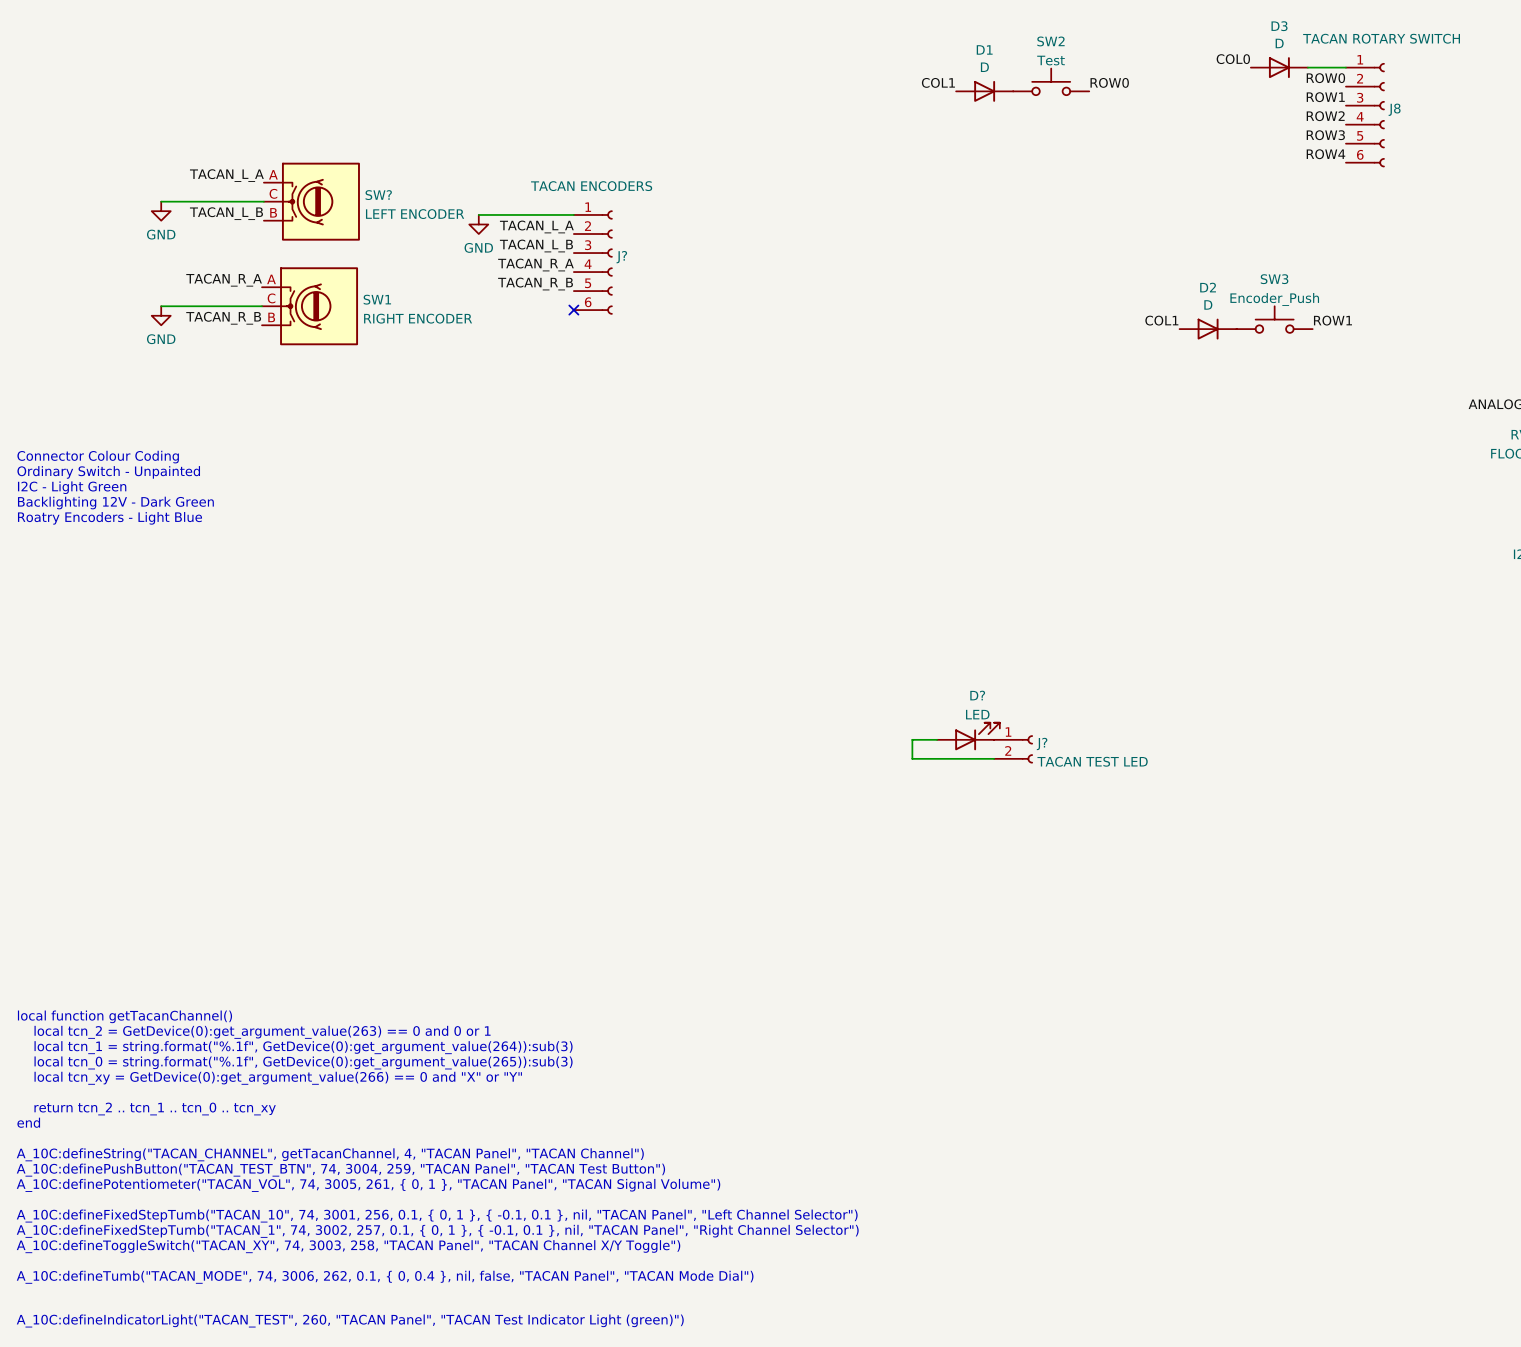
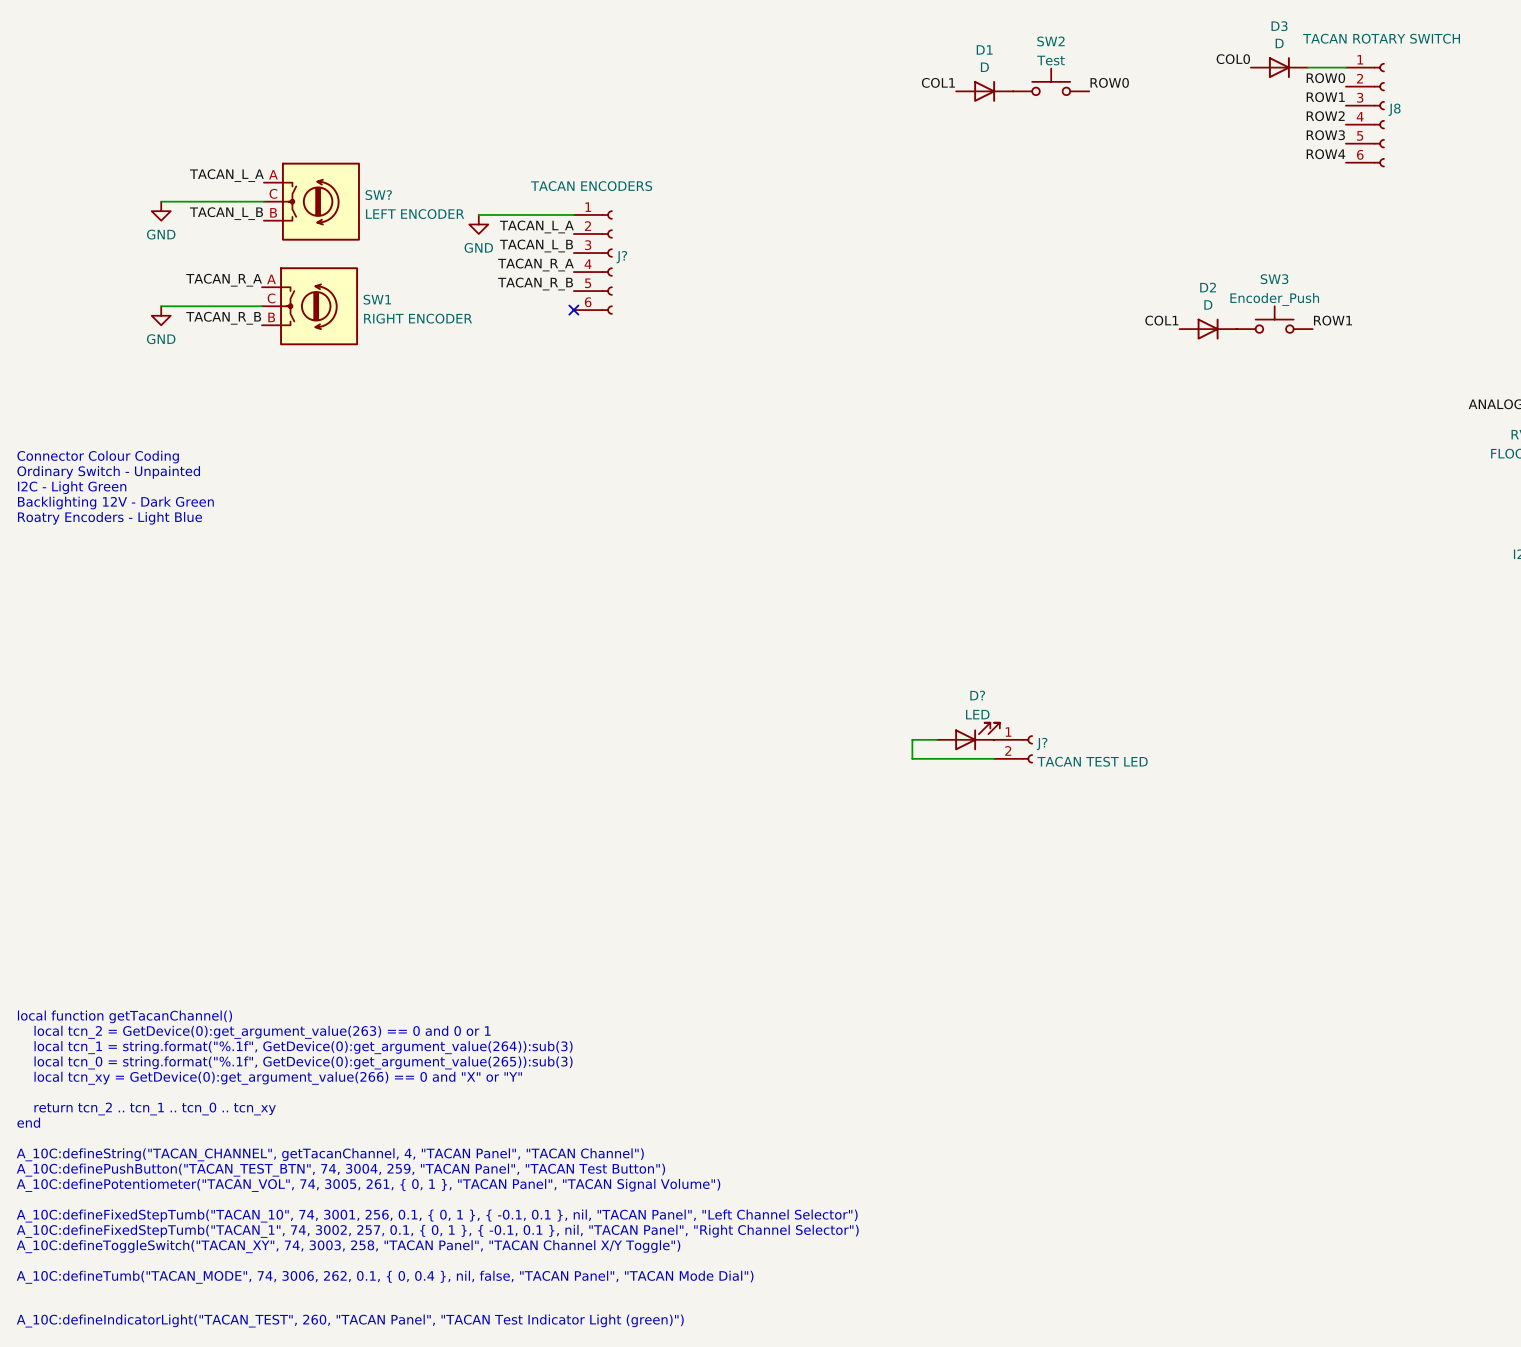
SW? symbol: [263, 162, 360, 241] -> [263, 162, 360, 241]
SW1 symbol: [262, 267, 359, 346] -> [262, 267, 359, 346]

